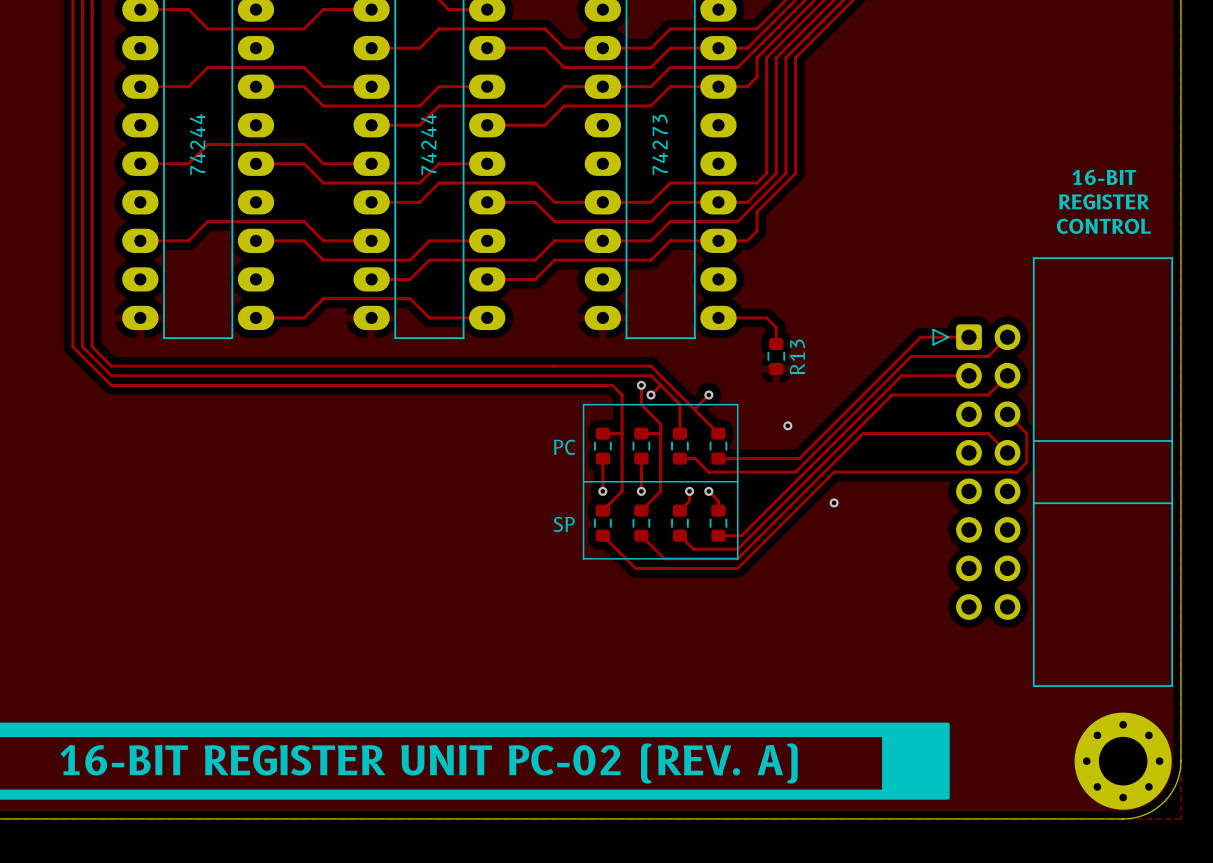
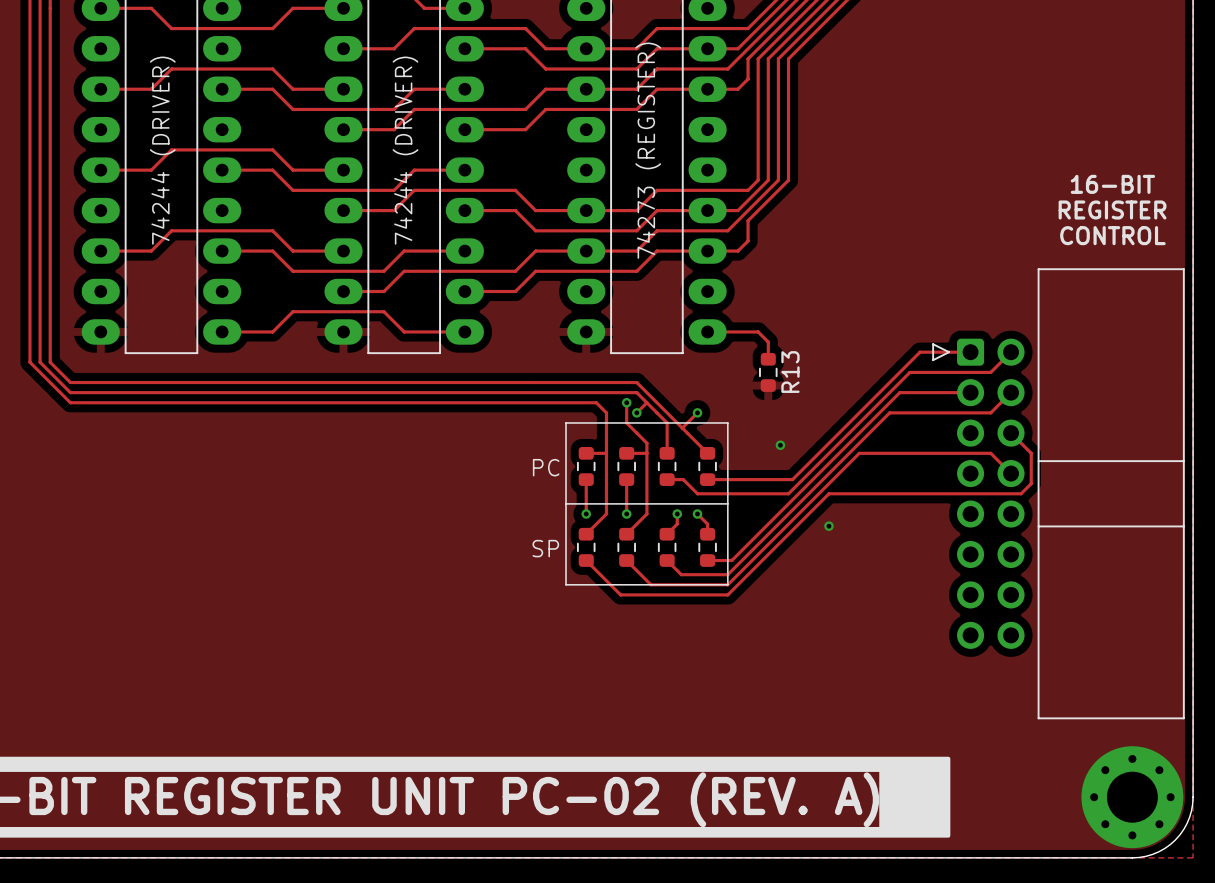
text: 74244 (197, 144) -> 74244 (DRIVER) (162, 150)
text: 74244 (428, 144) -> 74244 (DRIVER) (405, 150)
text: 74273 (660, 144) -> 74273 (REGISTER) (648, 150)

